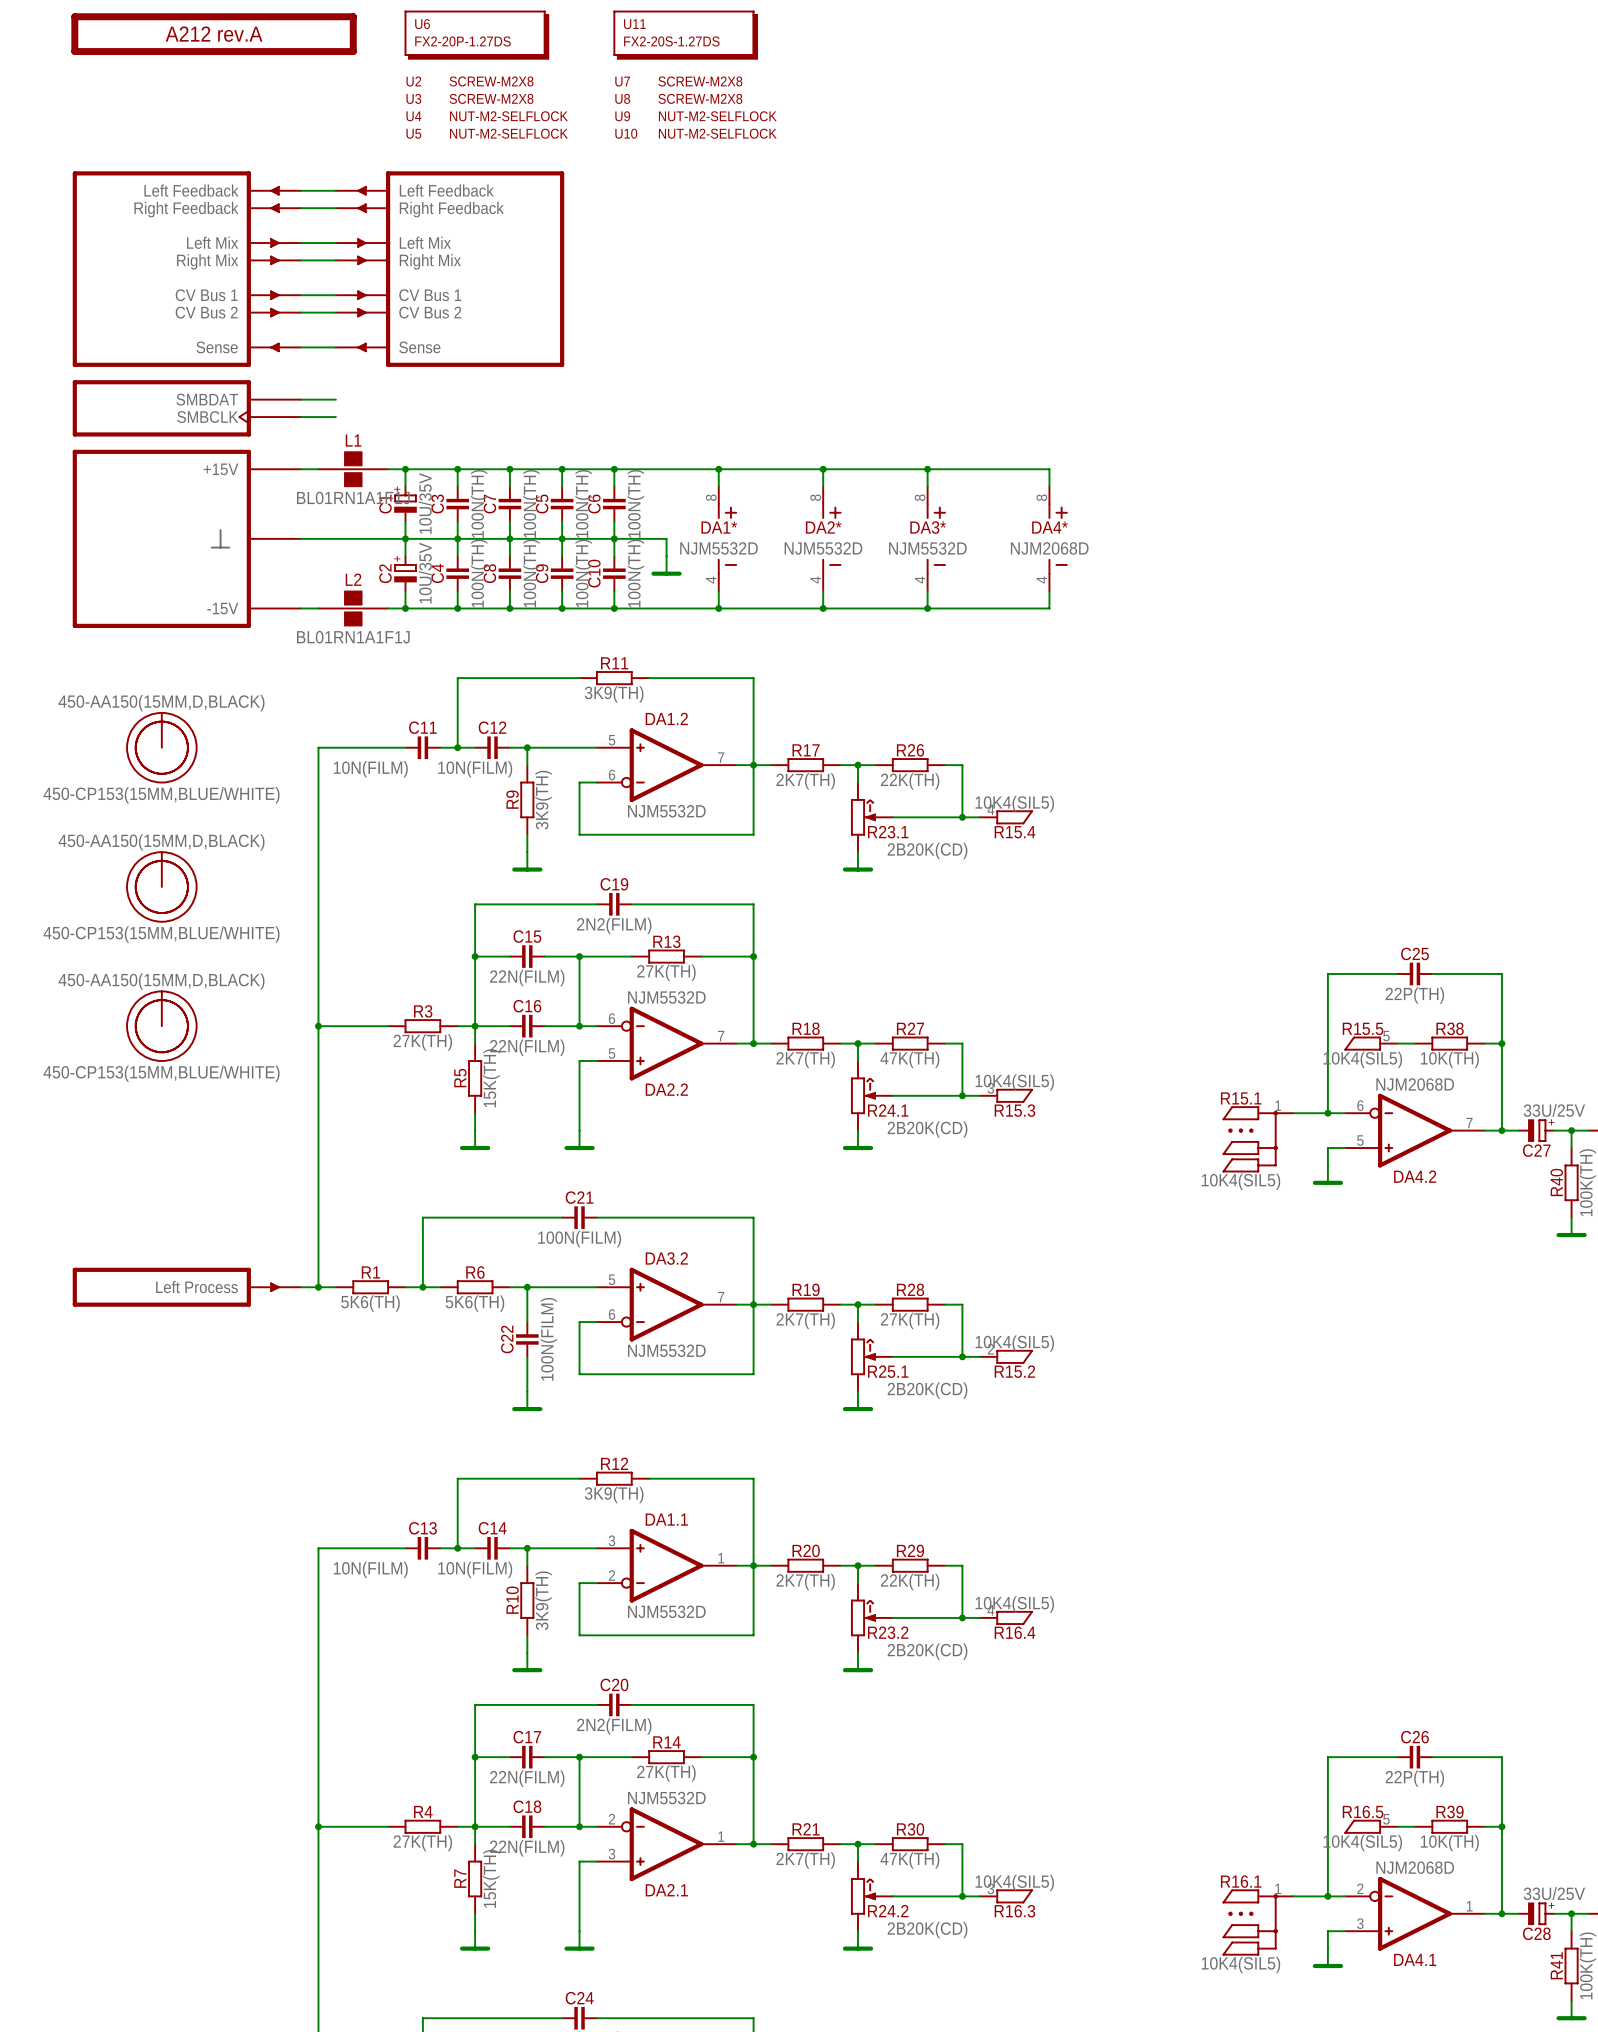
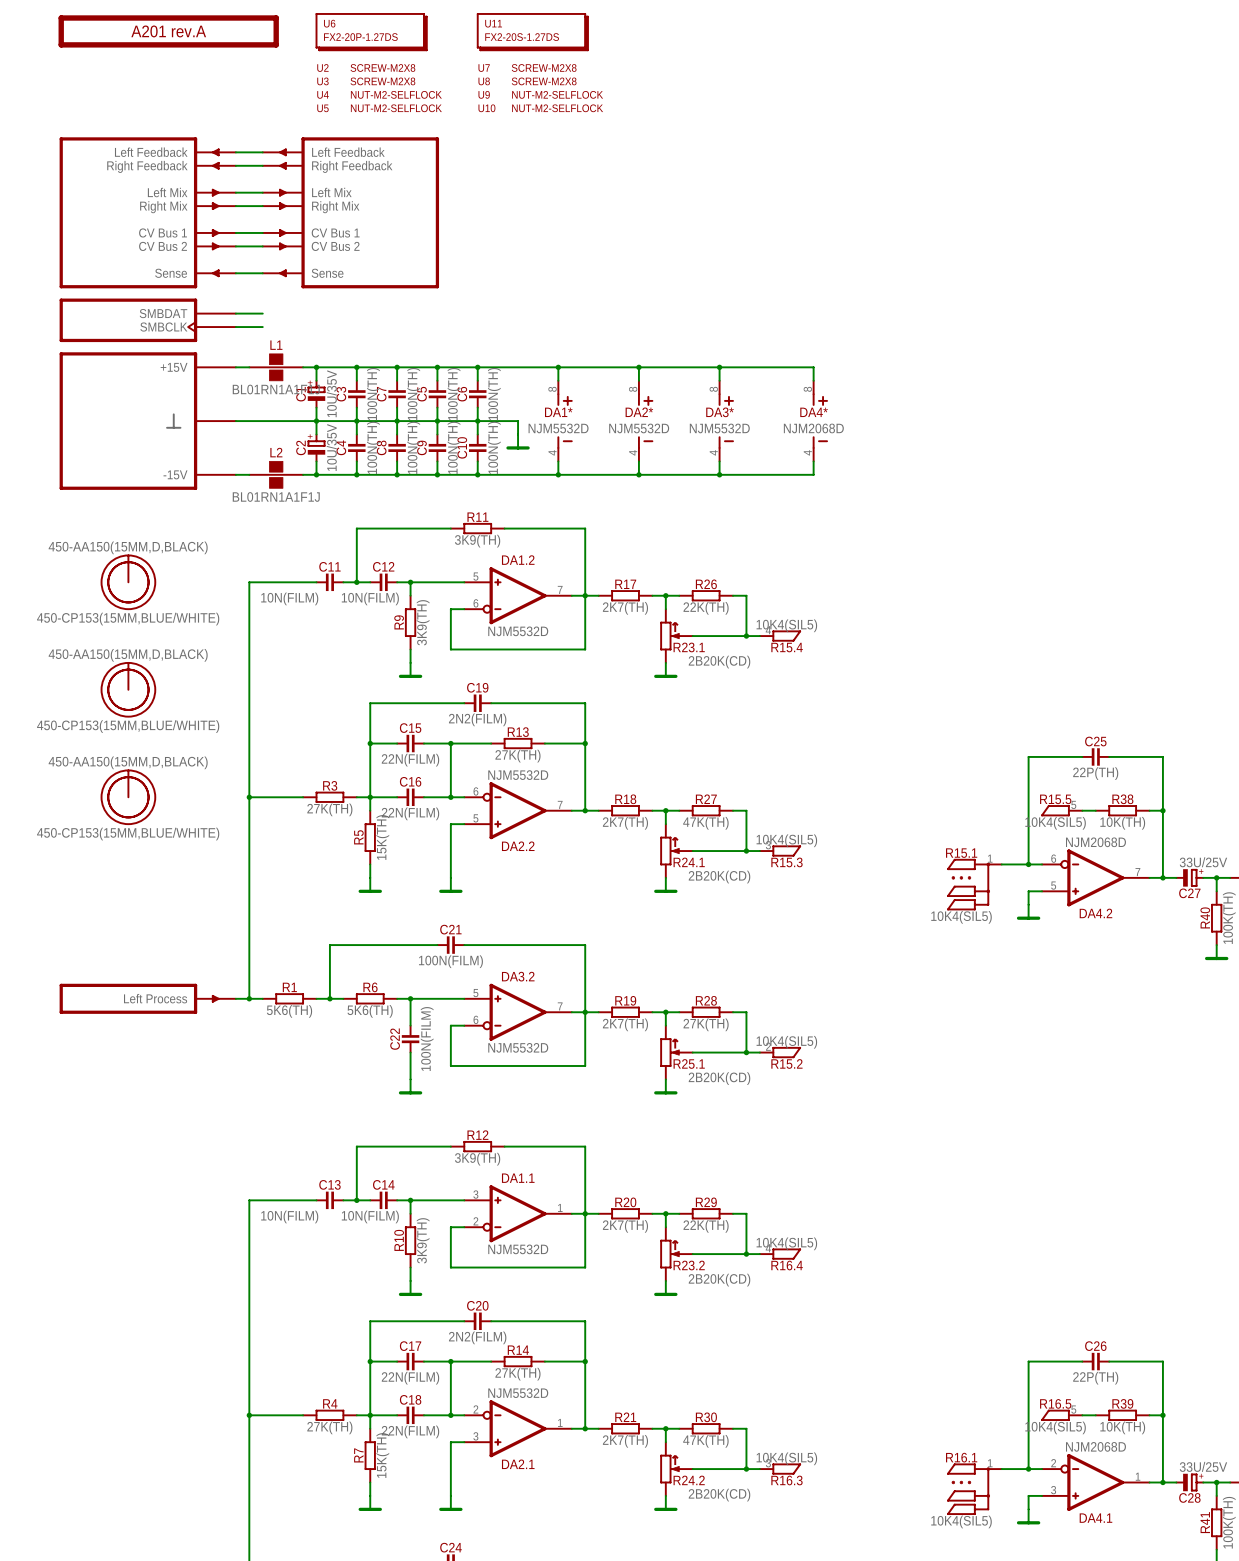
part value: A212 rev.A (214, 34) -> A201 rev.A (168, 31)

